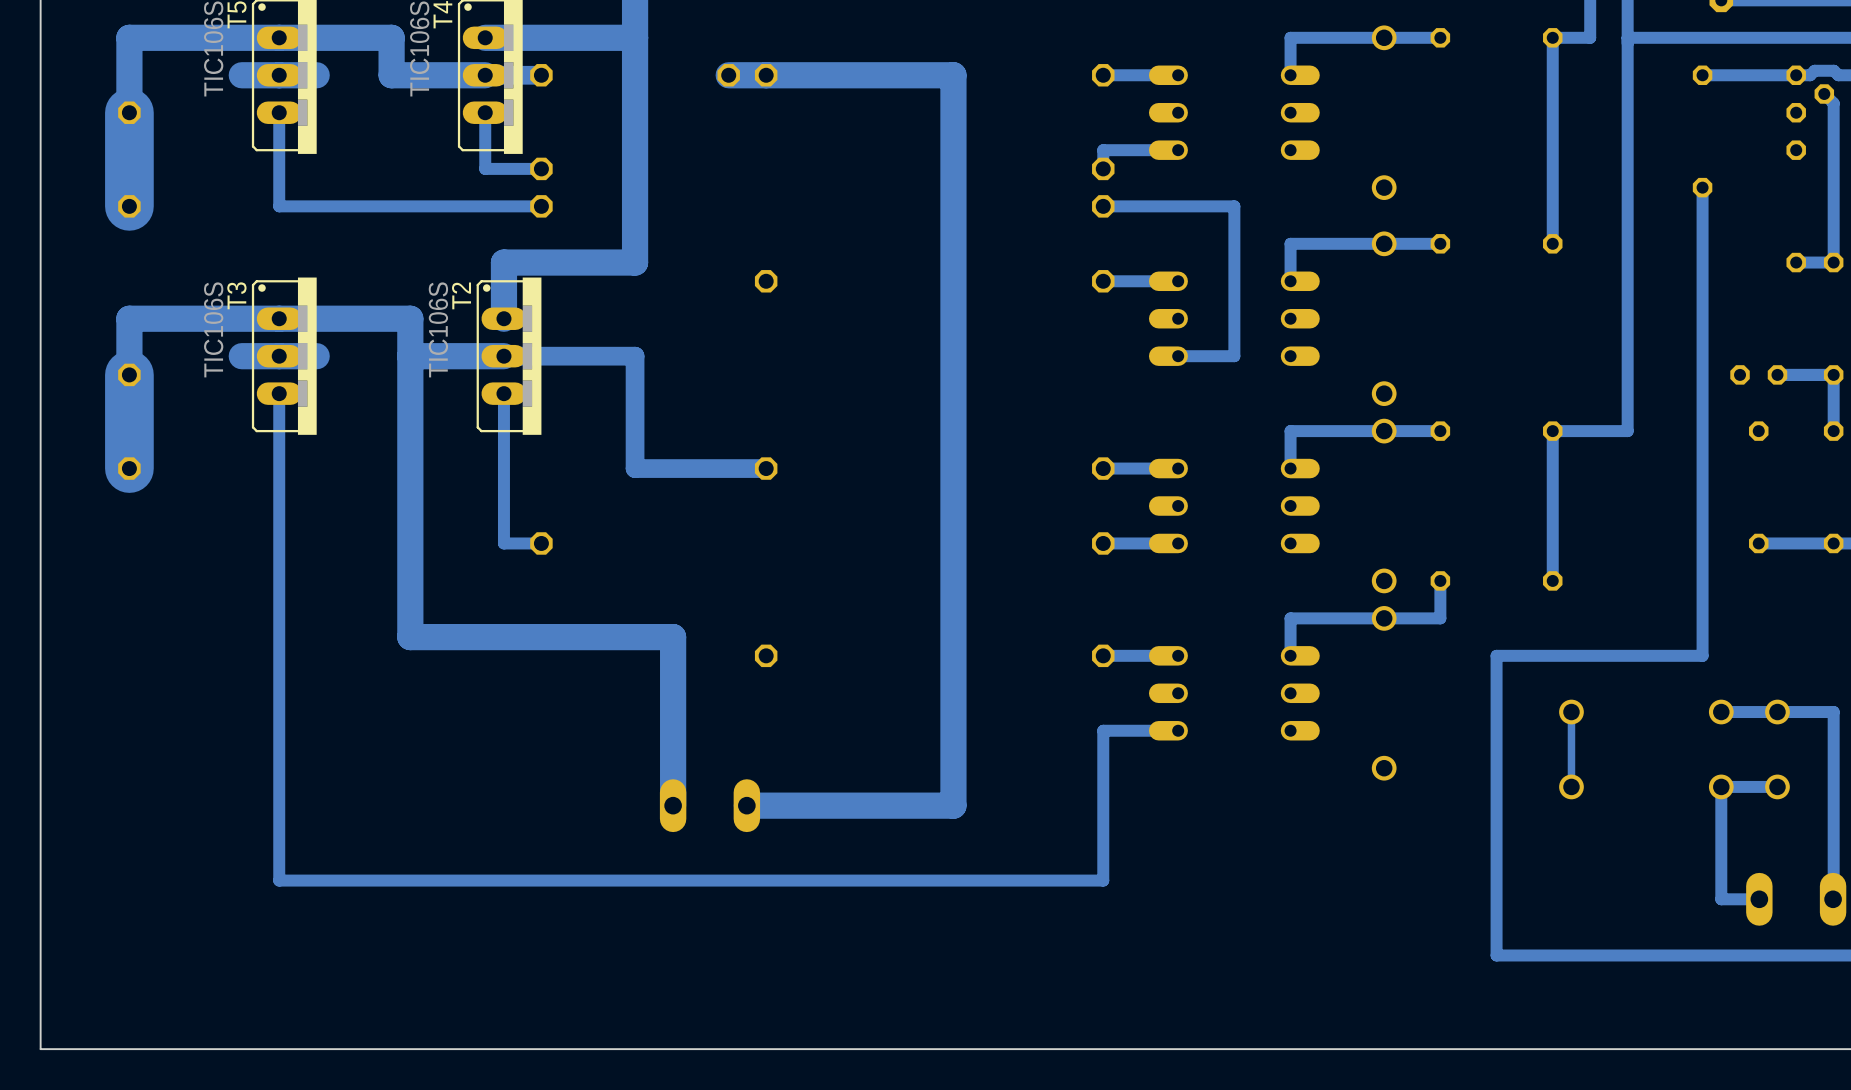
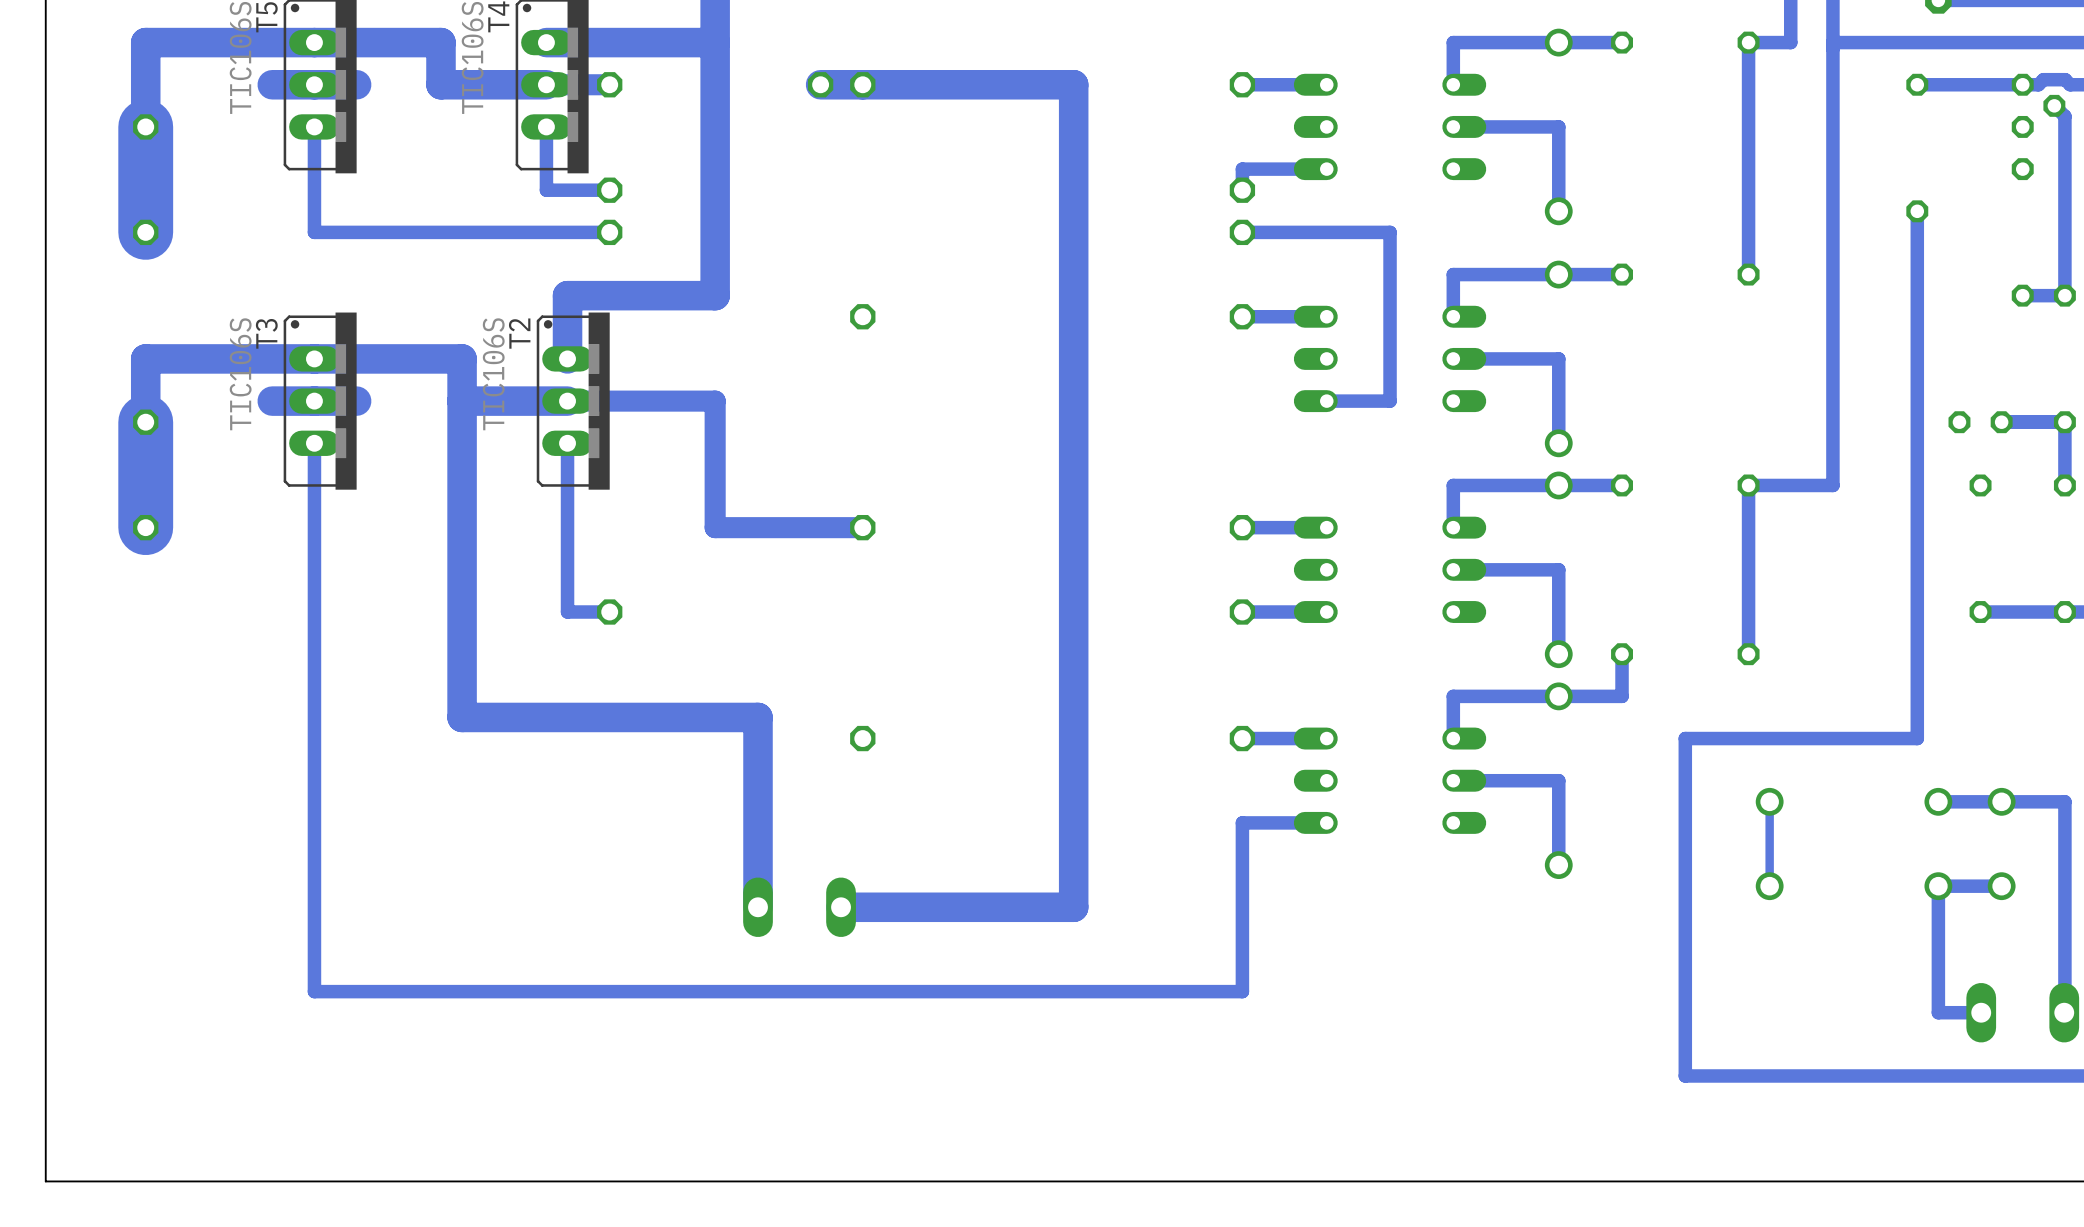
track: none -> (1453, 126) (1558, 126) (1558, 211)
track: none -> (1453, 358) (1558, 358) (1558, 443)
track: none -> (1453, 569) (1558, 569) (1558, 654)
track: none -> (1453, 780) (1558, 780) (1558, 865)

